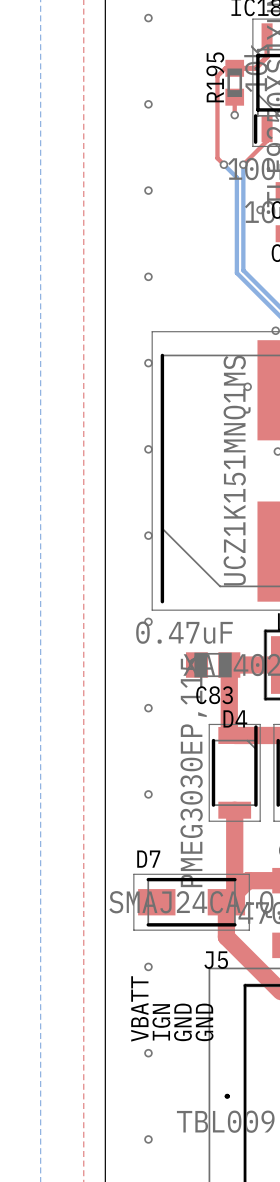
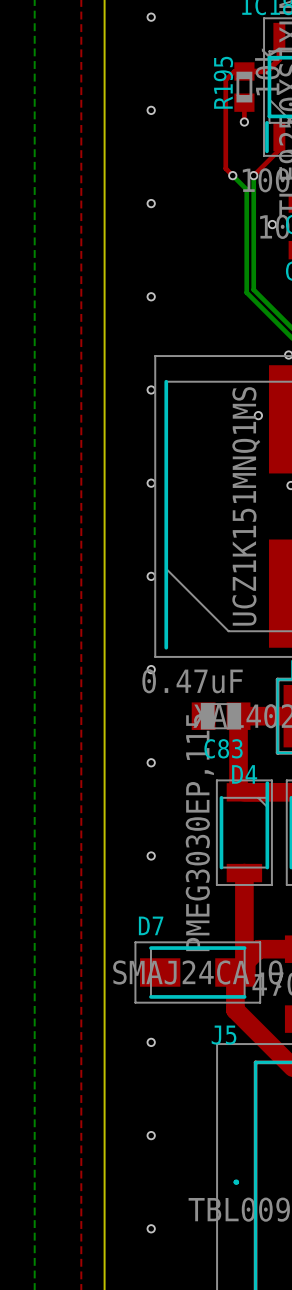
text: VBATT (139, 1008) -> none
text: IGN (161, 1022) -> none
text: GND (182, 1022) -> none
text: GND (204, 1022) -> none

